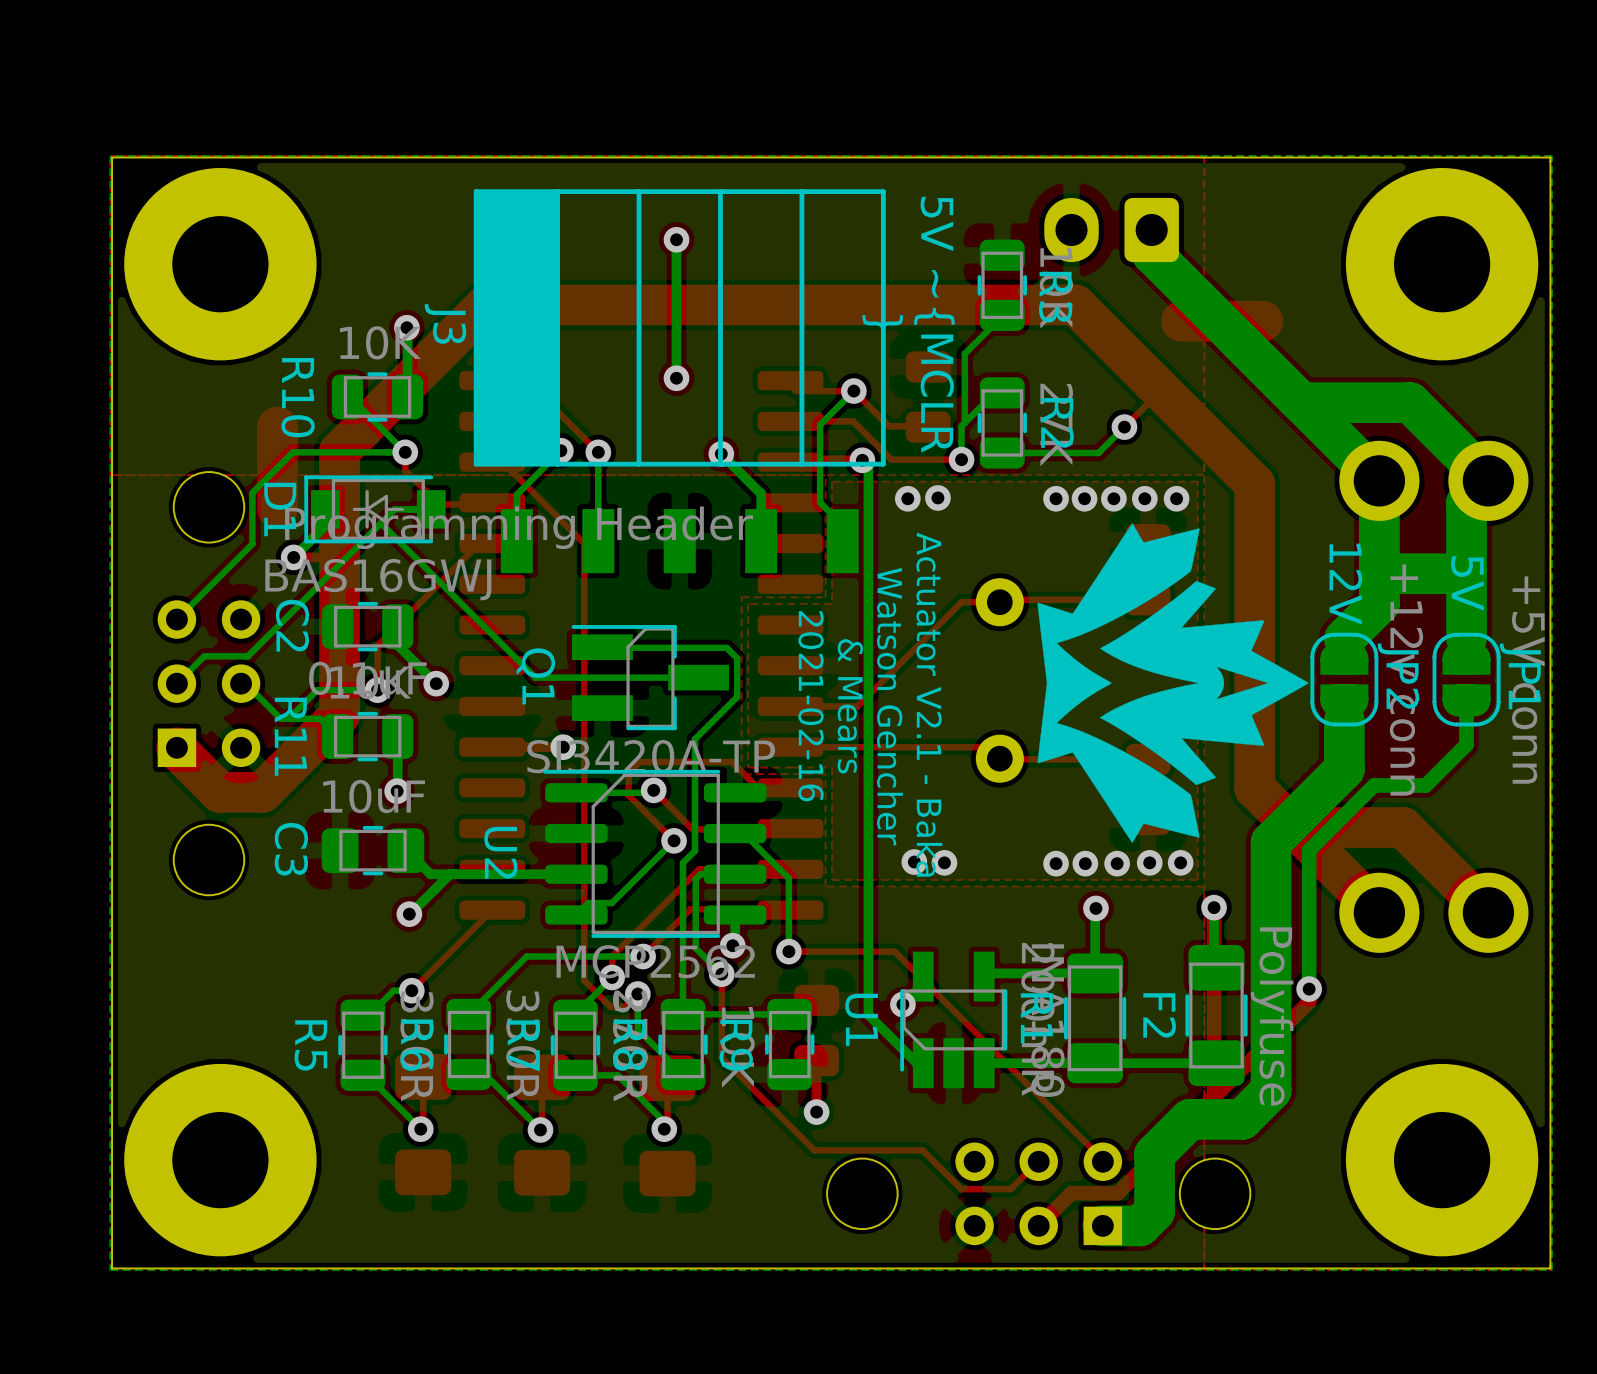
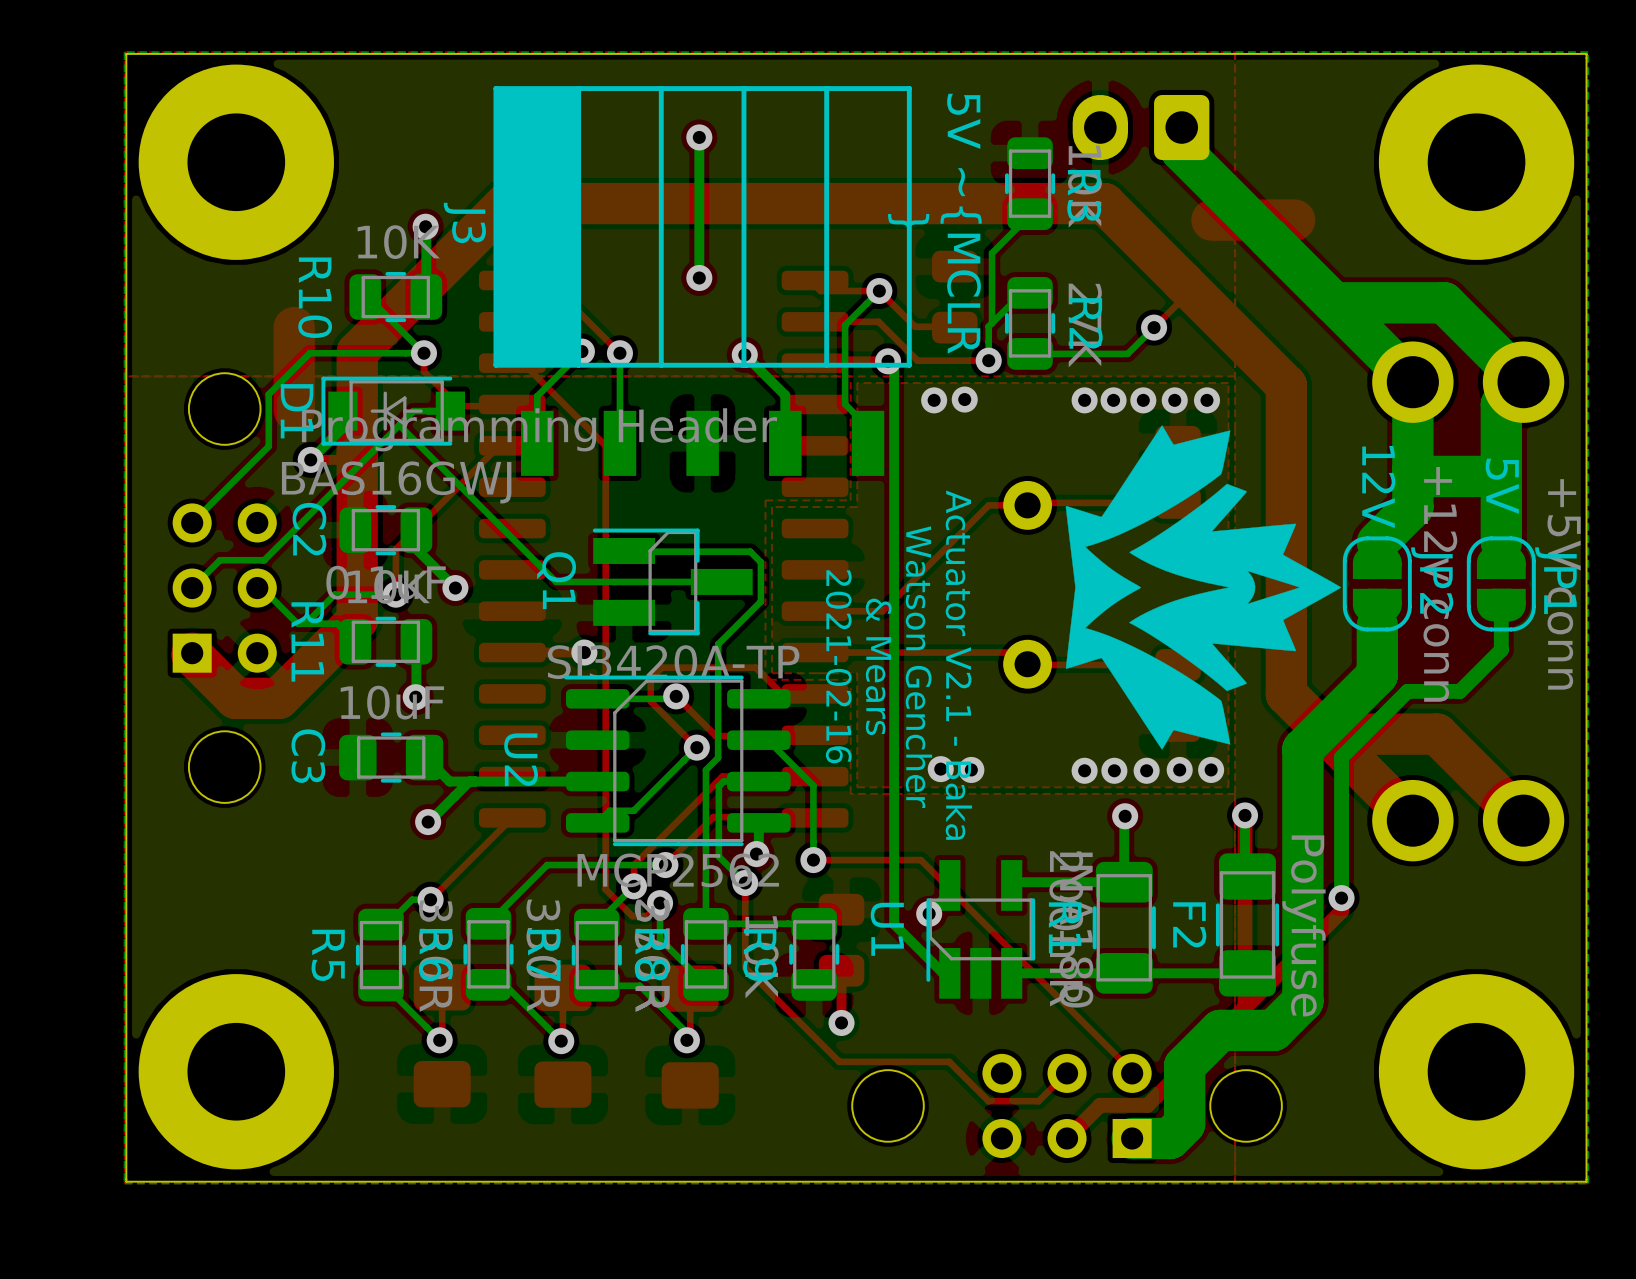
text position: Actuator V2.1 - Baka (929, 704) -> Actuator V2.1 - Baka (958, 665)
text position: 2021-02-16 (811, 706) -> 2021-02-16 (838, 666)
text position: & Mears (850, 706) -> & Mears (878, 666)
text position: Watson Gencher (889, 706) -> Watson Gencher (918, 667)

